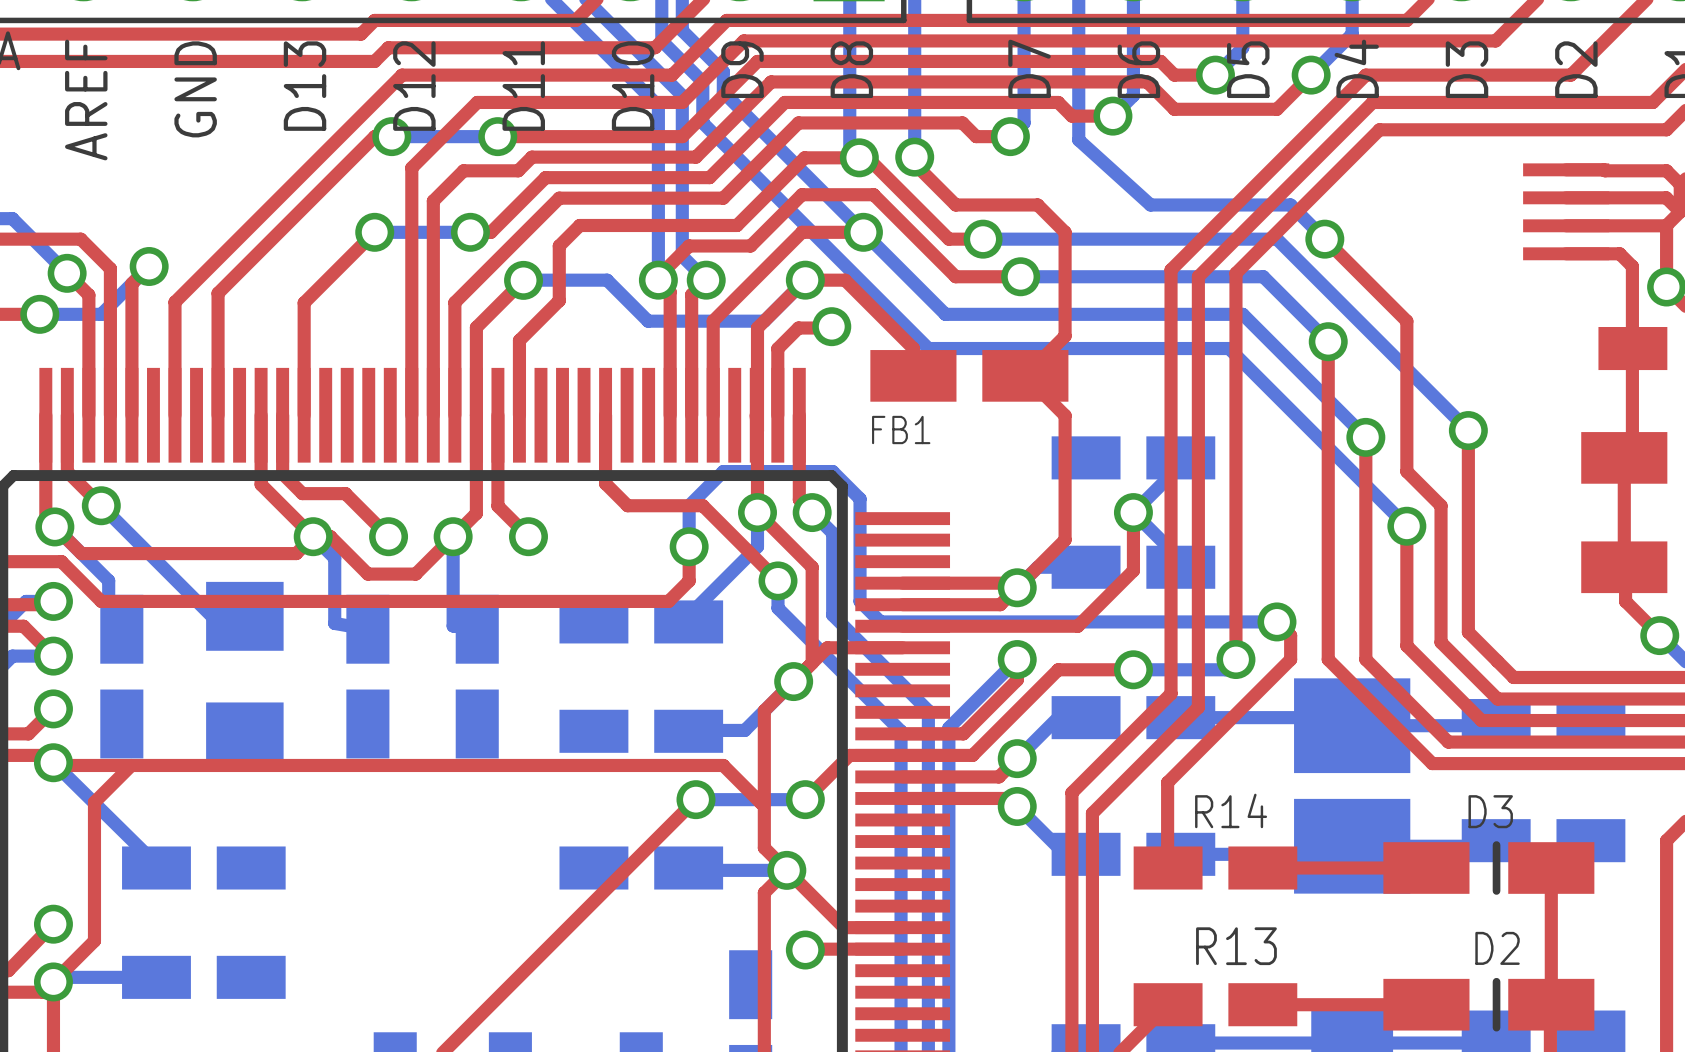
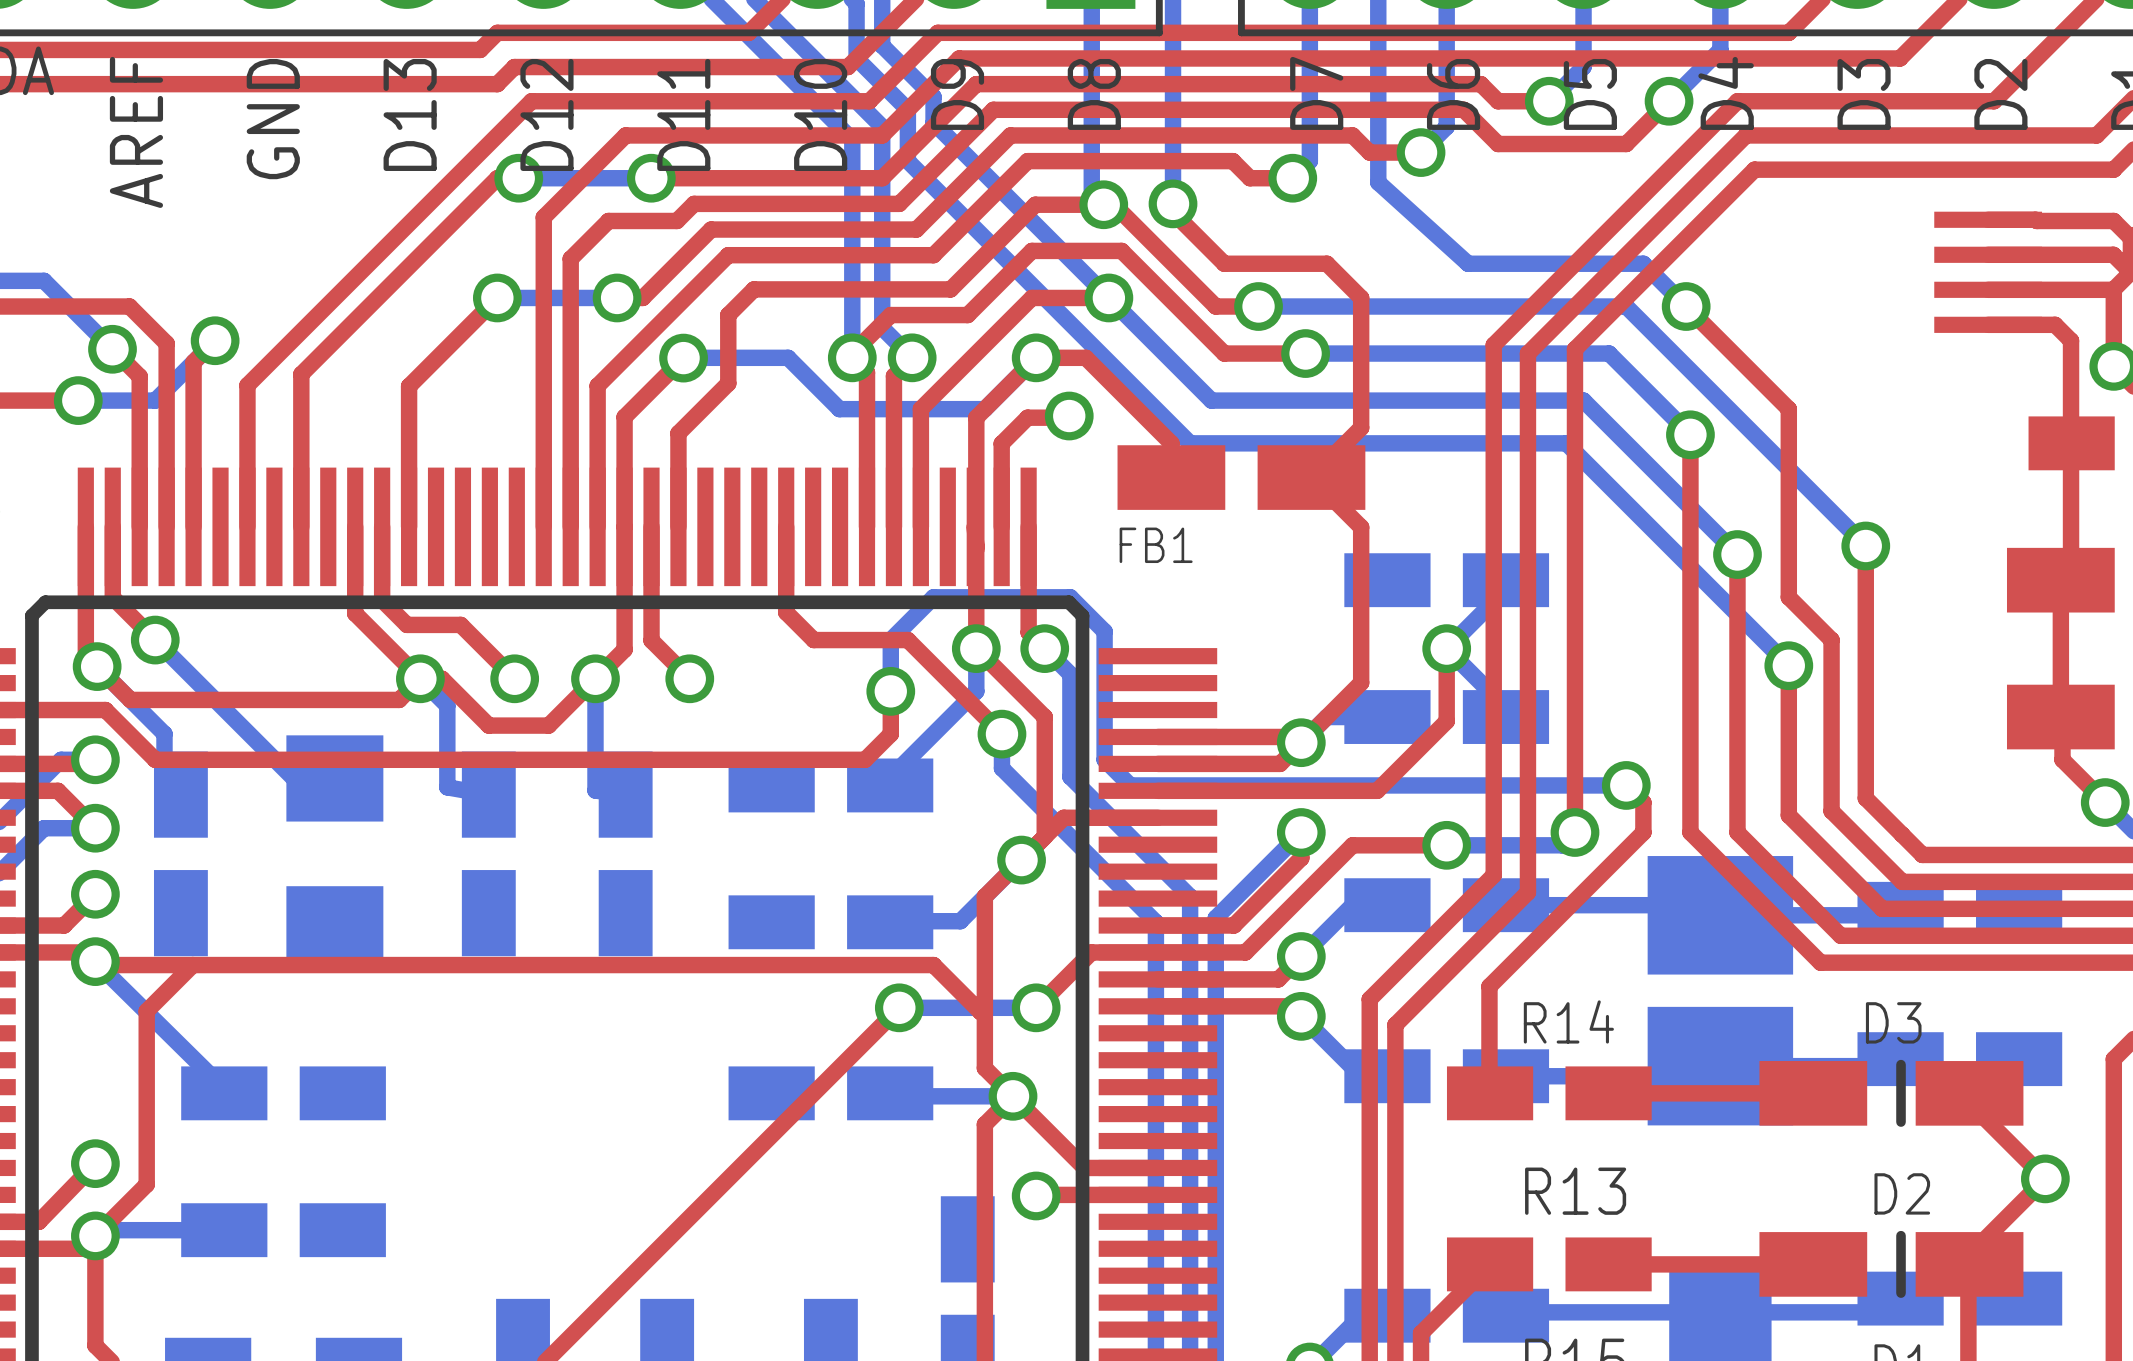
top track: (1551, 875) (1551, 996) -> (1969, 1103) (2045, 1178) (1969, 1254)
via: none -> (2045, 1178)

